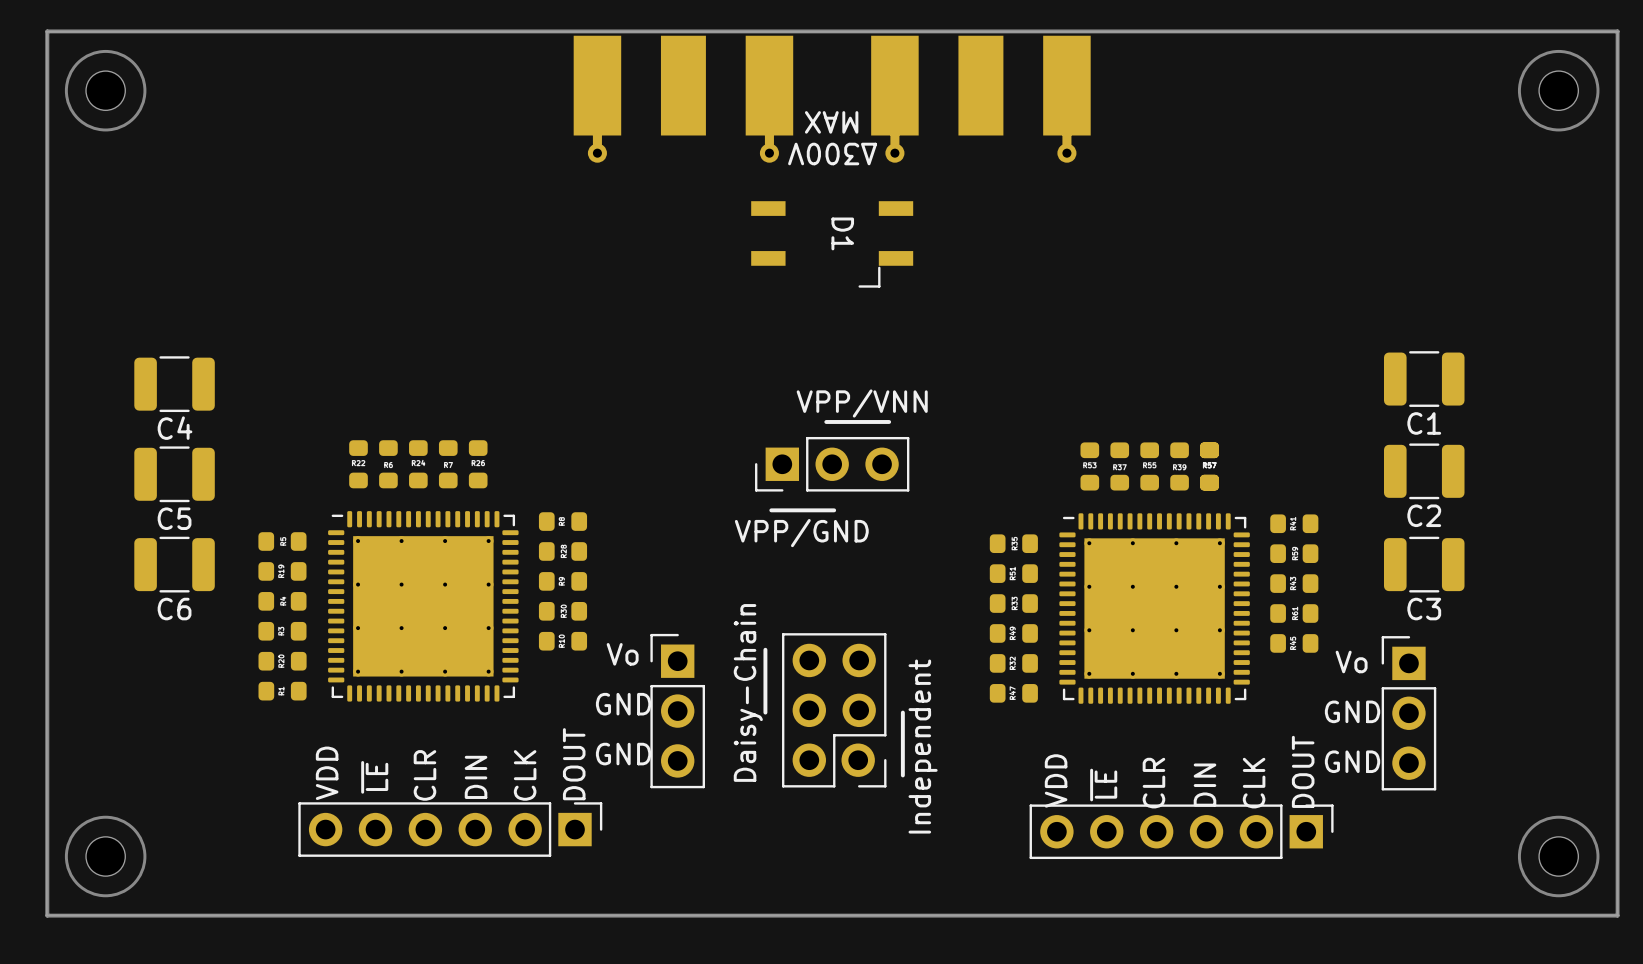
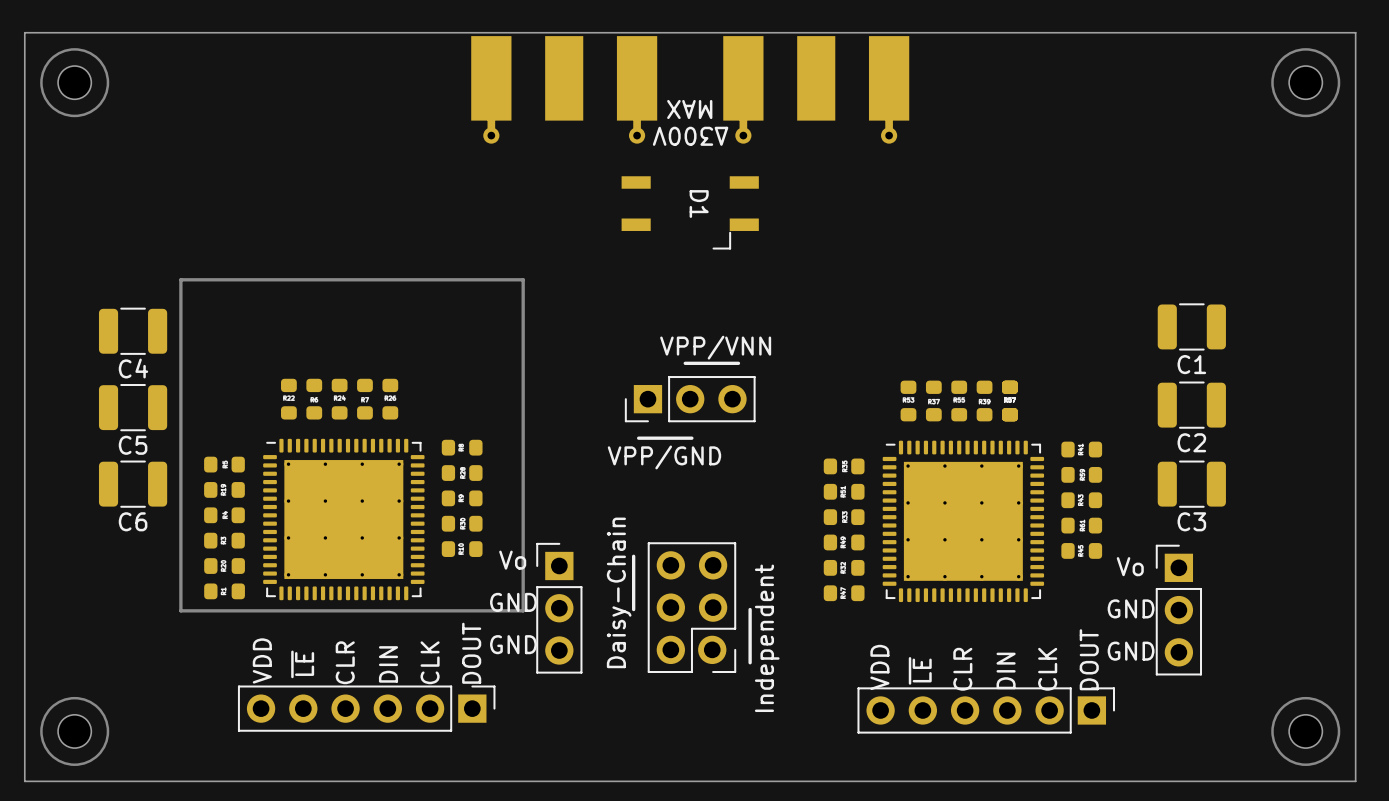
line: (47, 31) (1617, 31) (1617, 915) (47, 915) (47, 31) -> none
line: none -> (180, 279) (523, 279) (523, 610) (180, 610) (180, 279)

